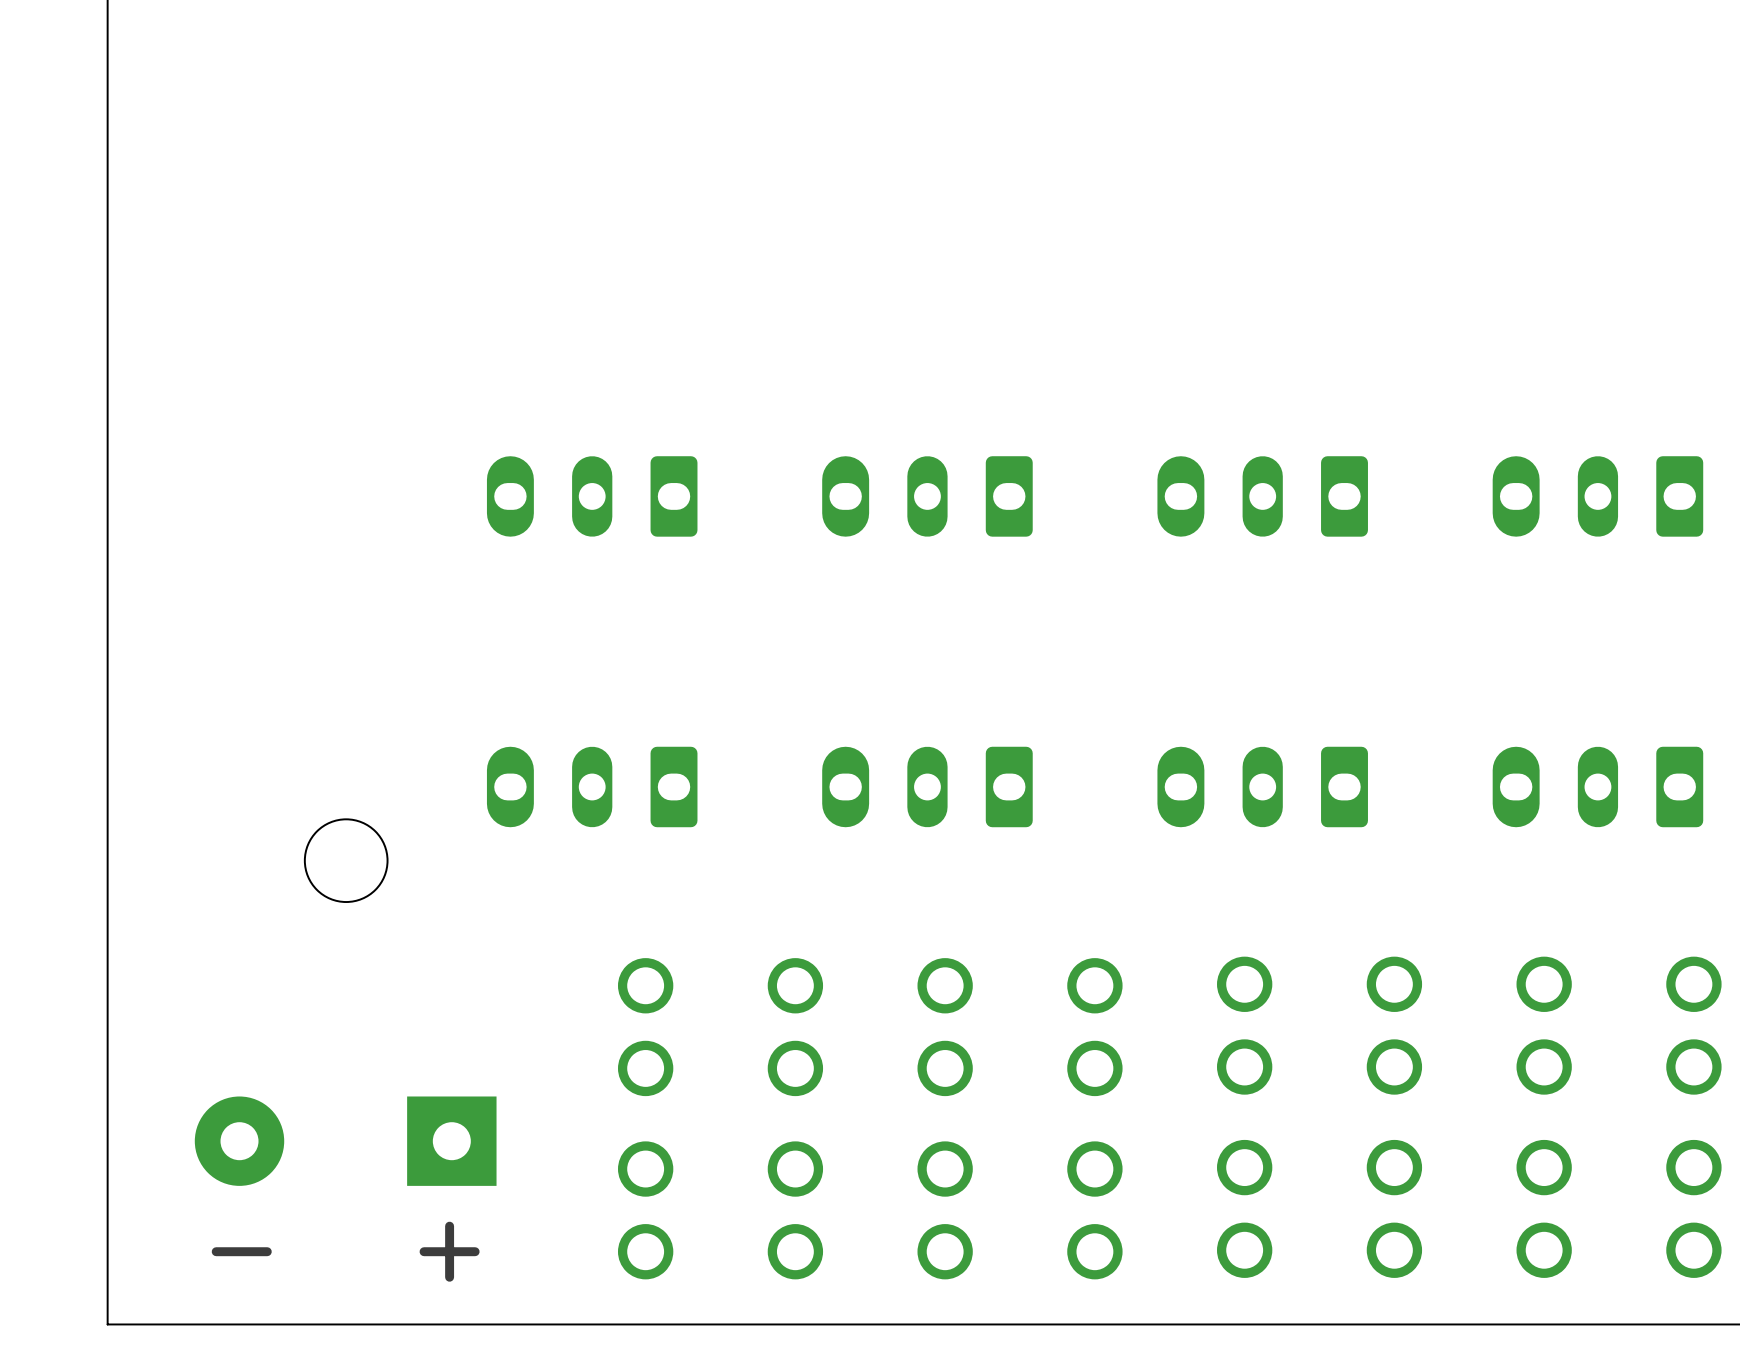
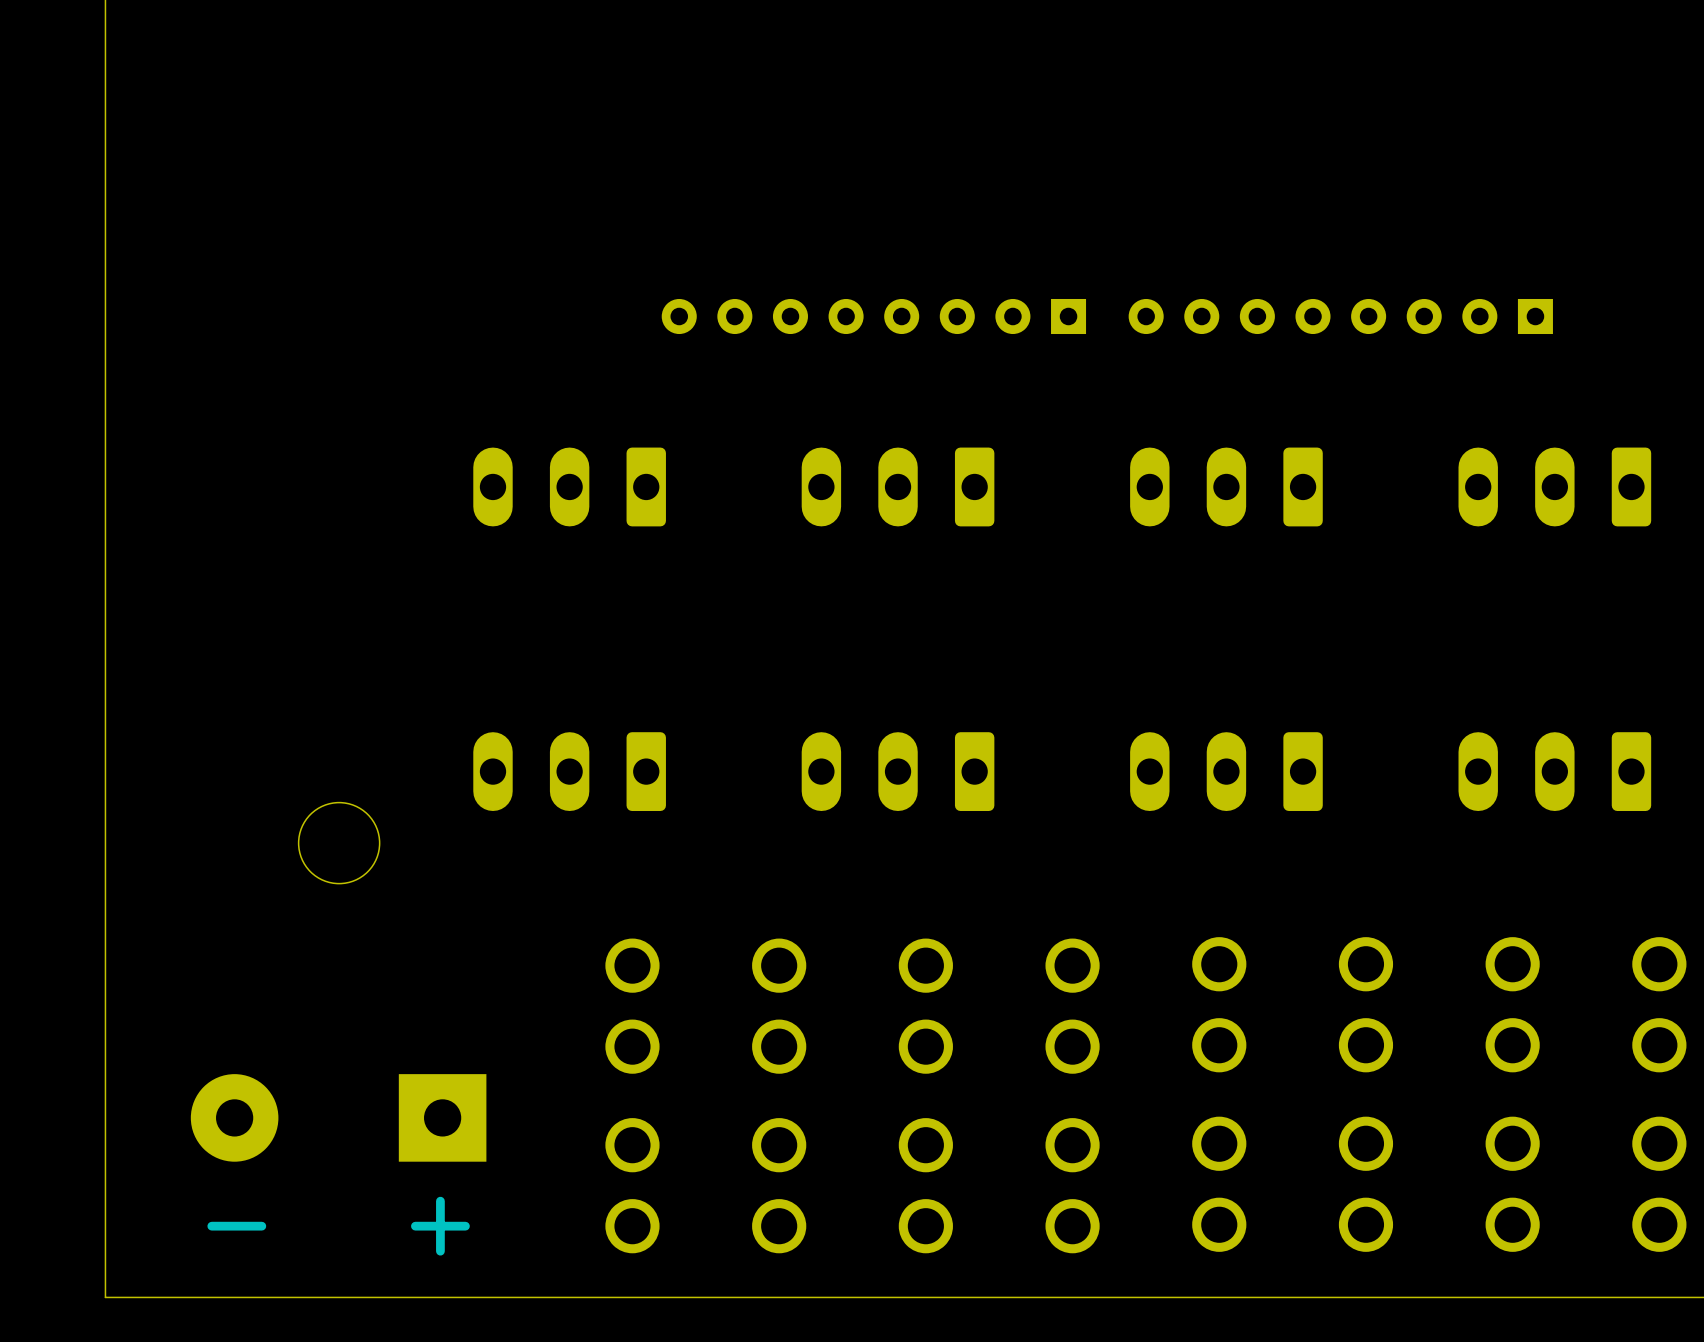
part: none -> (873, 316)
part: none -> (1340, 316)
part footprint: [486, 456, 698, 537] -> [473, 447, 666, 527]
part footprint: [822, 456, 1033, 537] -> [801, 447, 995, 527]
part footprint: [1157, 456, 1368, 537] -> [1130, 447, 1323, 527]
part footprint: [1492, 456, 1704, 537] -> [1458, 447, 1652, 527]
part footprint: [486, 746, 698, 828] -> [473, 732, 666, 812]
part footprint: [822, 746, 1033, 828] -> [801, 732, 995, 812]
part footprint: [1157, 746, 1368, 828] -> [1130, 732, 1323, 812]
part footprint: [1492, 746, 1704, 828] -> [1458, 732, 1652, 812]

